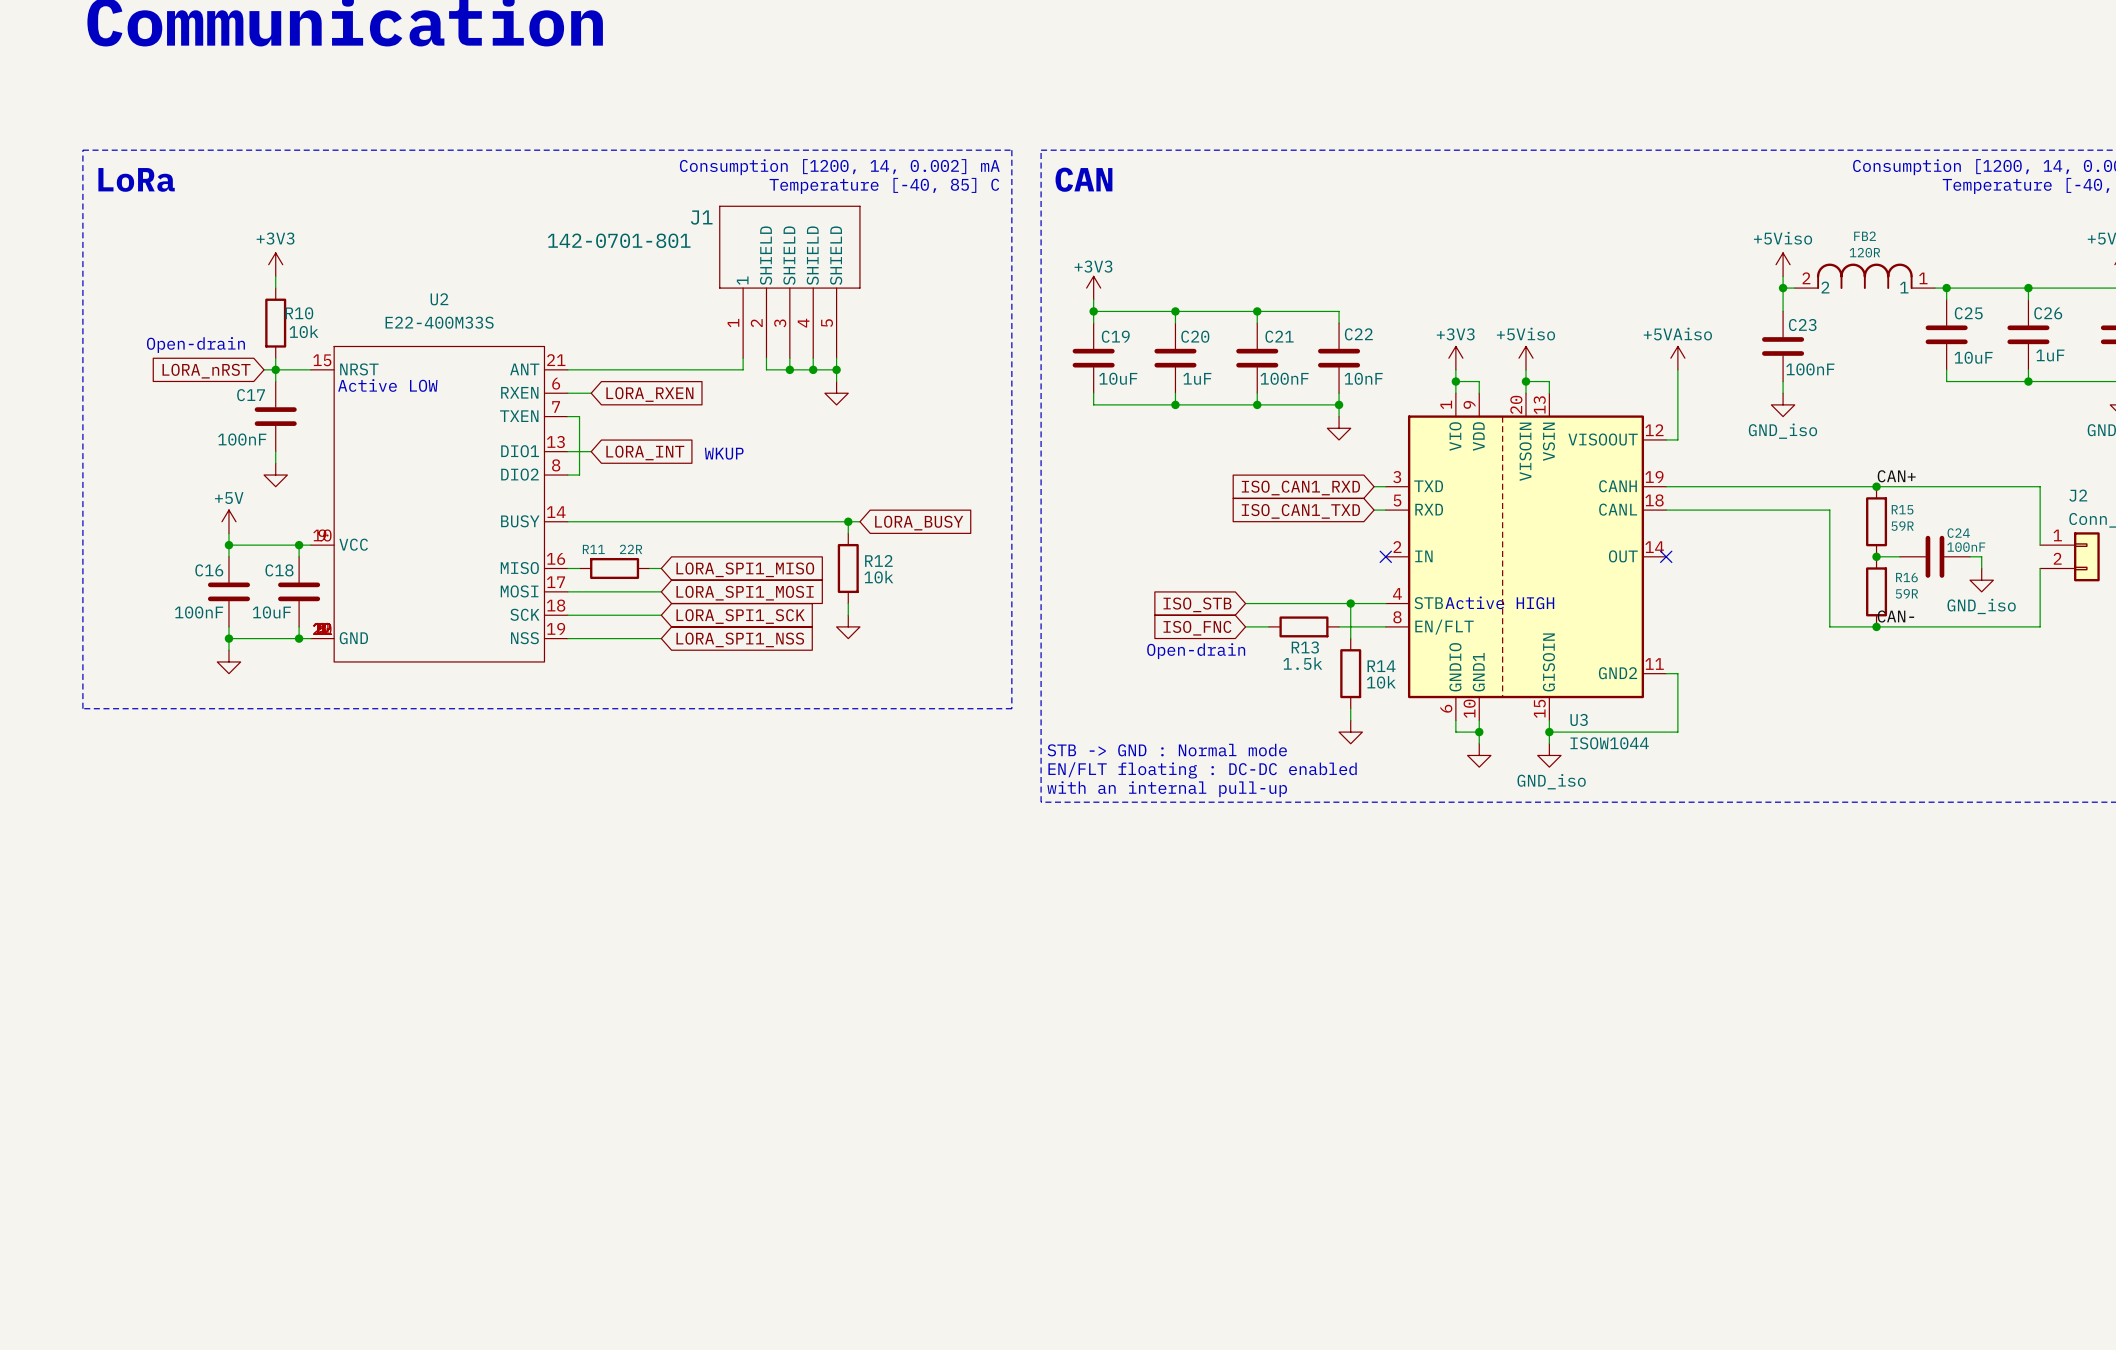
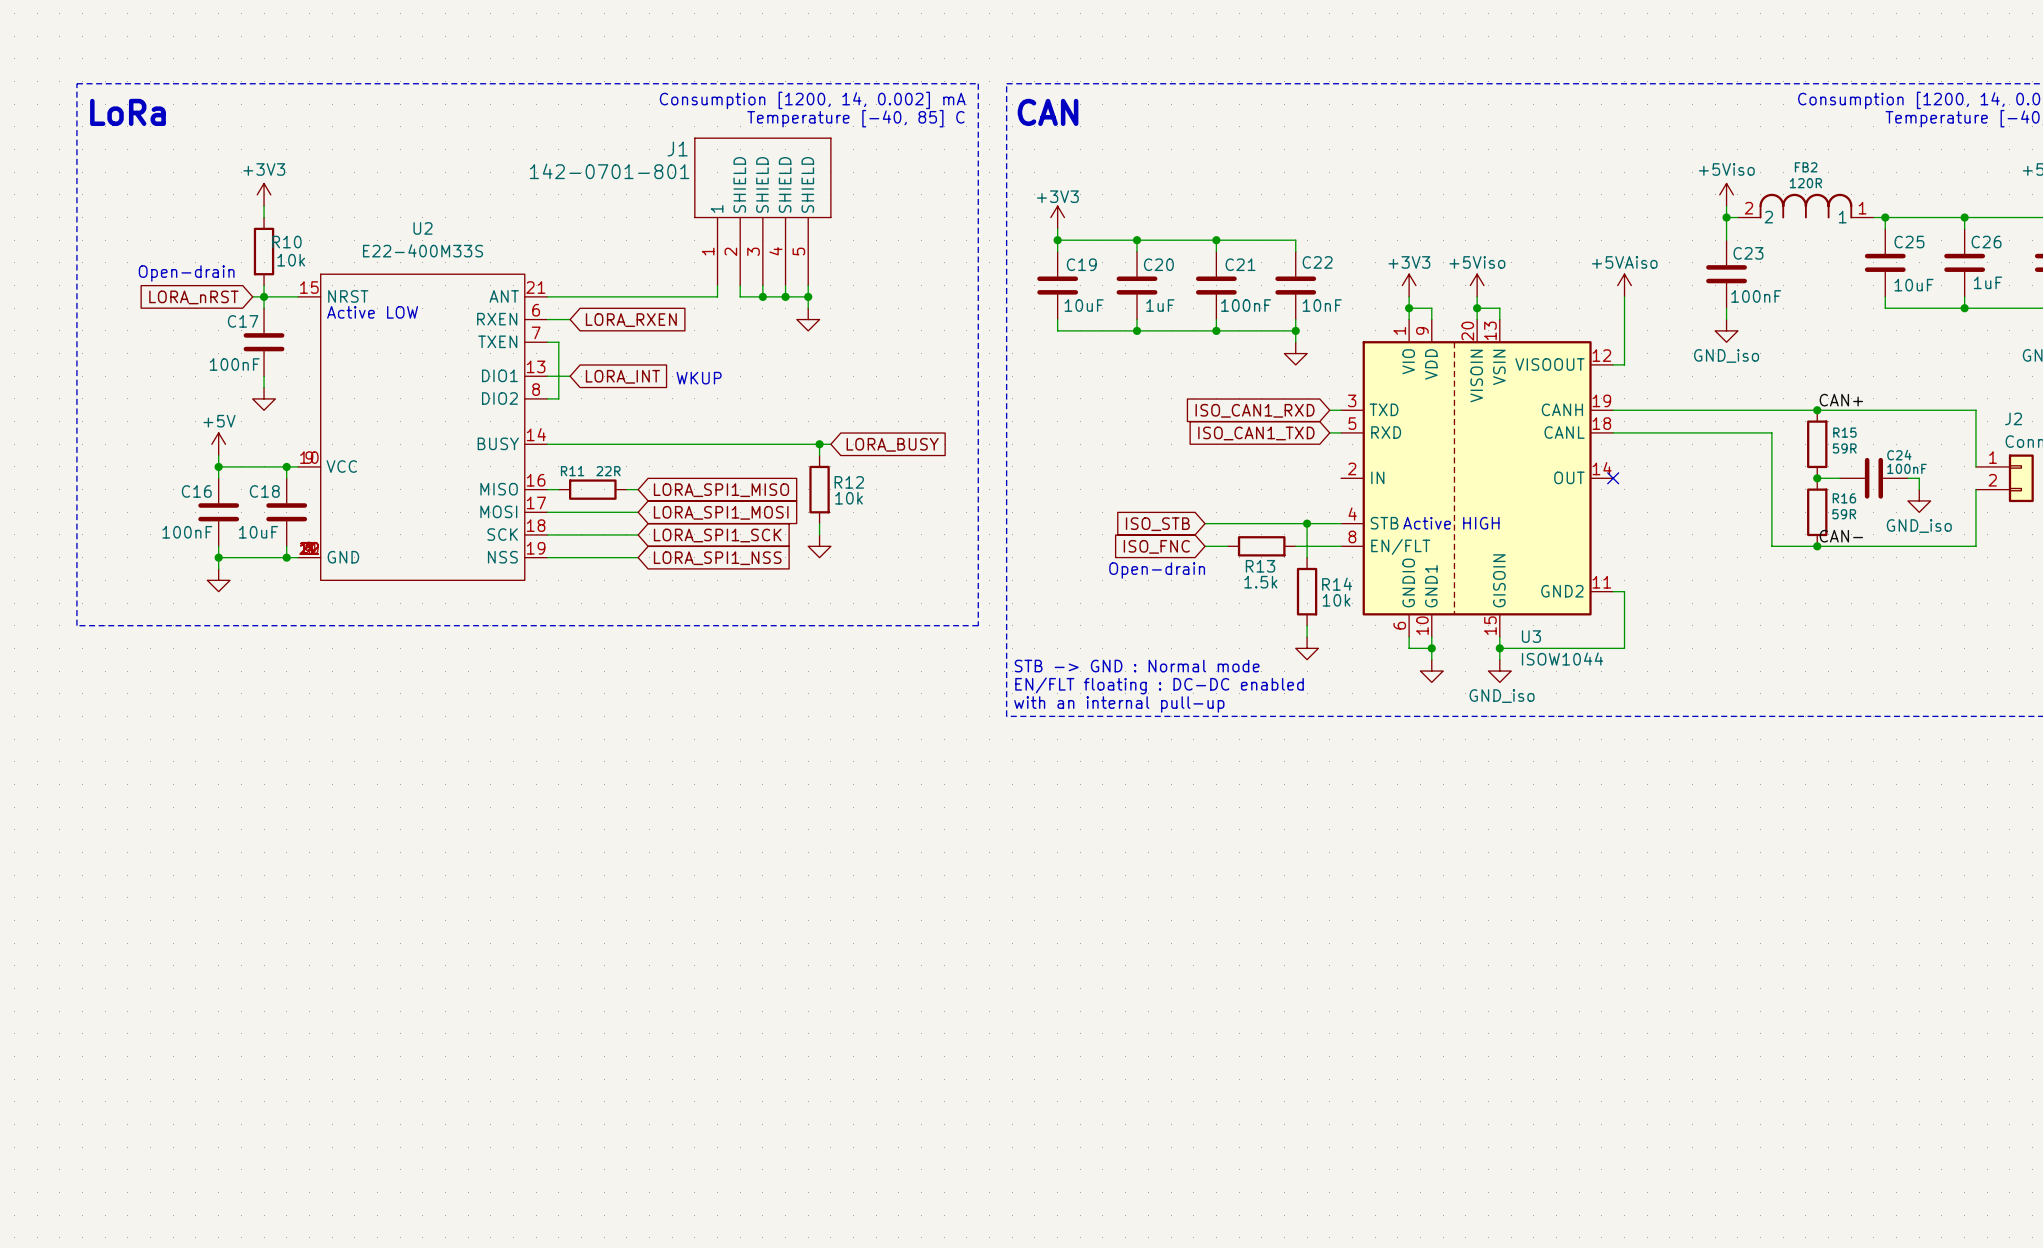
no-connect mark: (1385, 556) -> none

